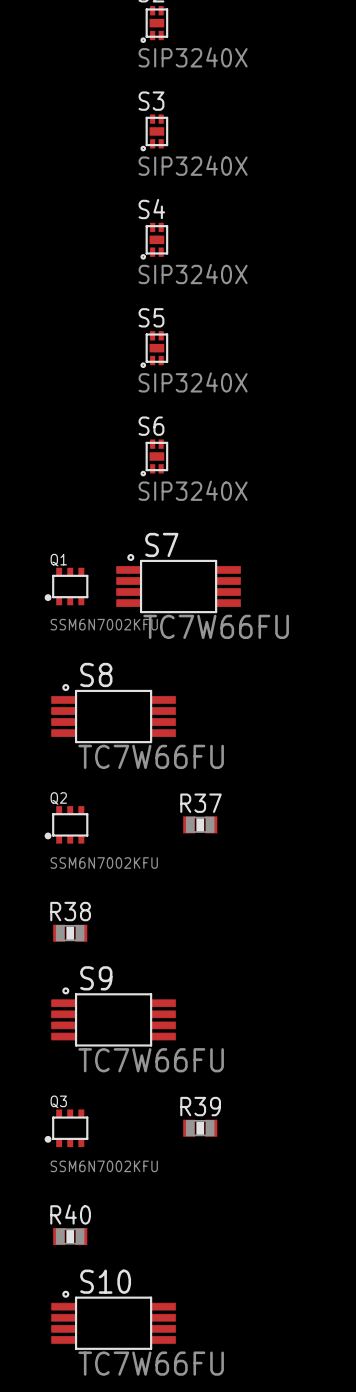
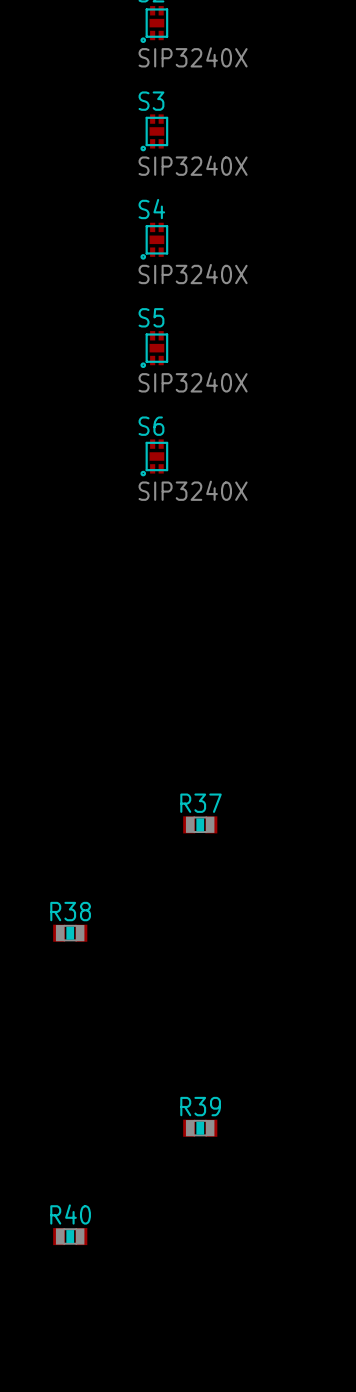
S7: TC7W66FU (178, 583) -> none
Q1: SSM6N7002KFU (66, 586) -> none
S8: TC7W66FU (113, 713) -> none
Q2: SSM6N7002KFU (66, 824) -> none
S9: TC7W66FU (113, 1016) -> none
Q3: SSM6N7002KFU (66, 1128) -> none
S10: TC7W66FU (113, 1320) -> none

